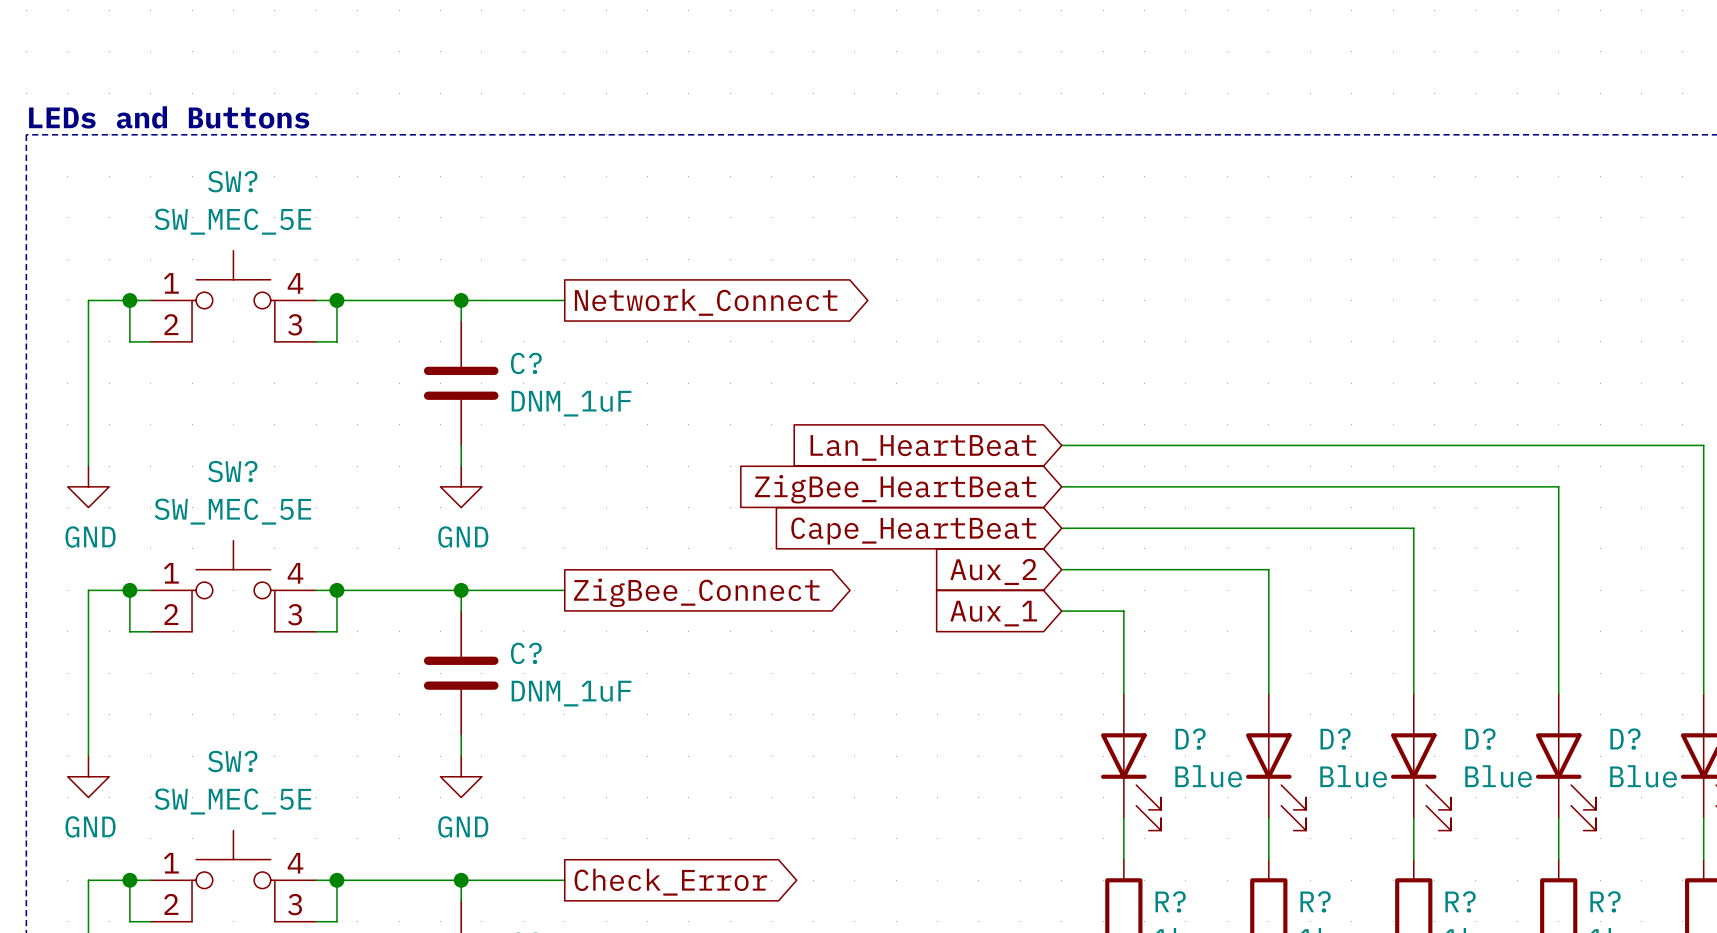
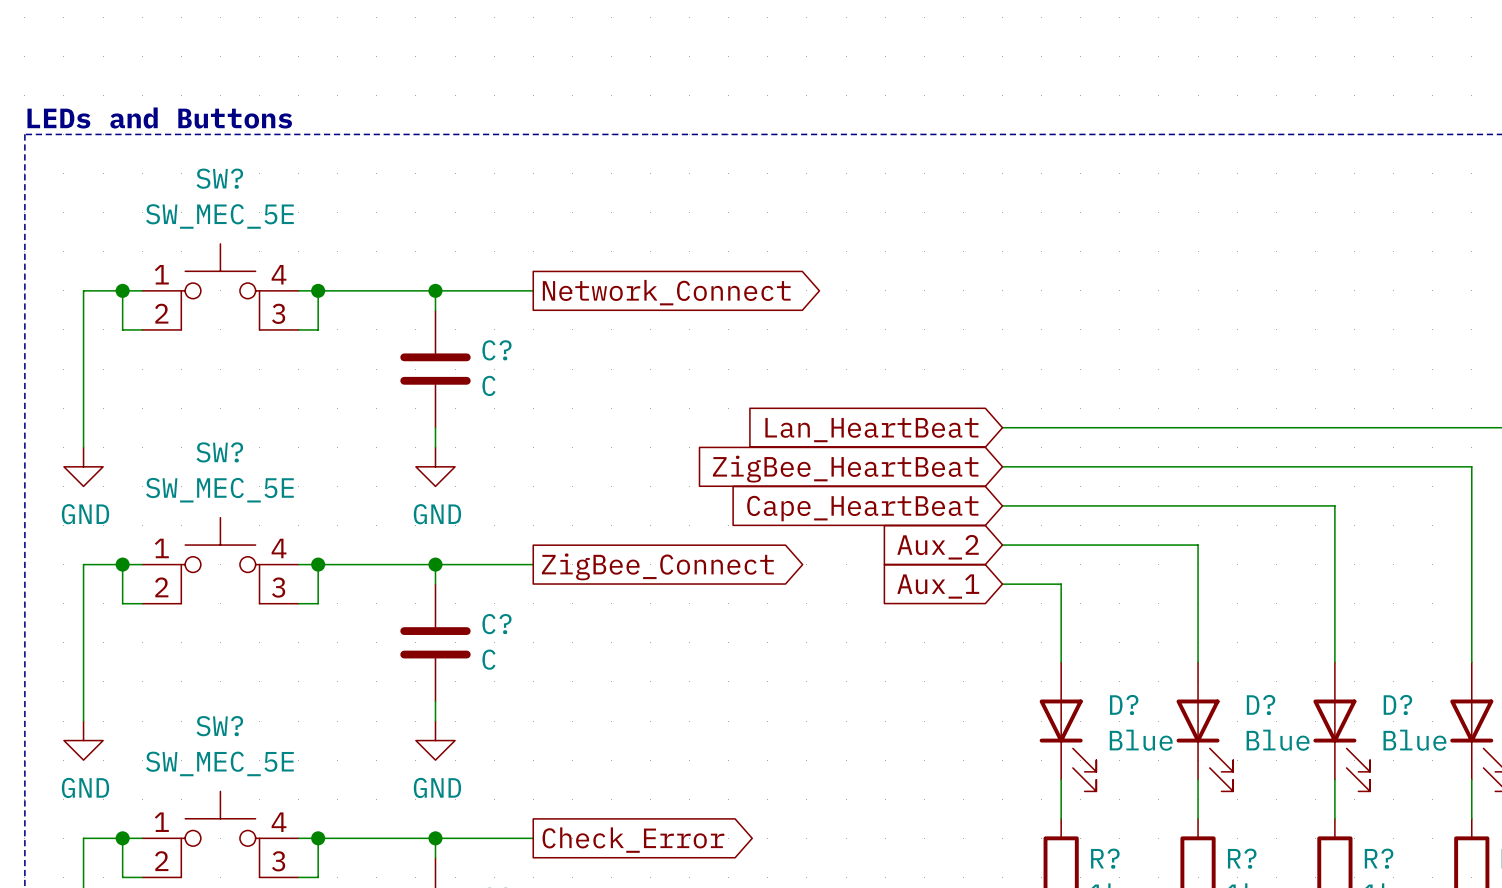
C? value: DNM_1uF (571, 403) -> C (488, 385)
C? value: DNM_1uF (571, 693) -> C (488, 659)

